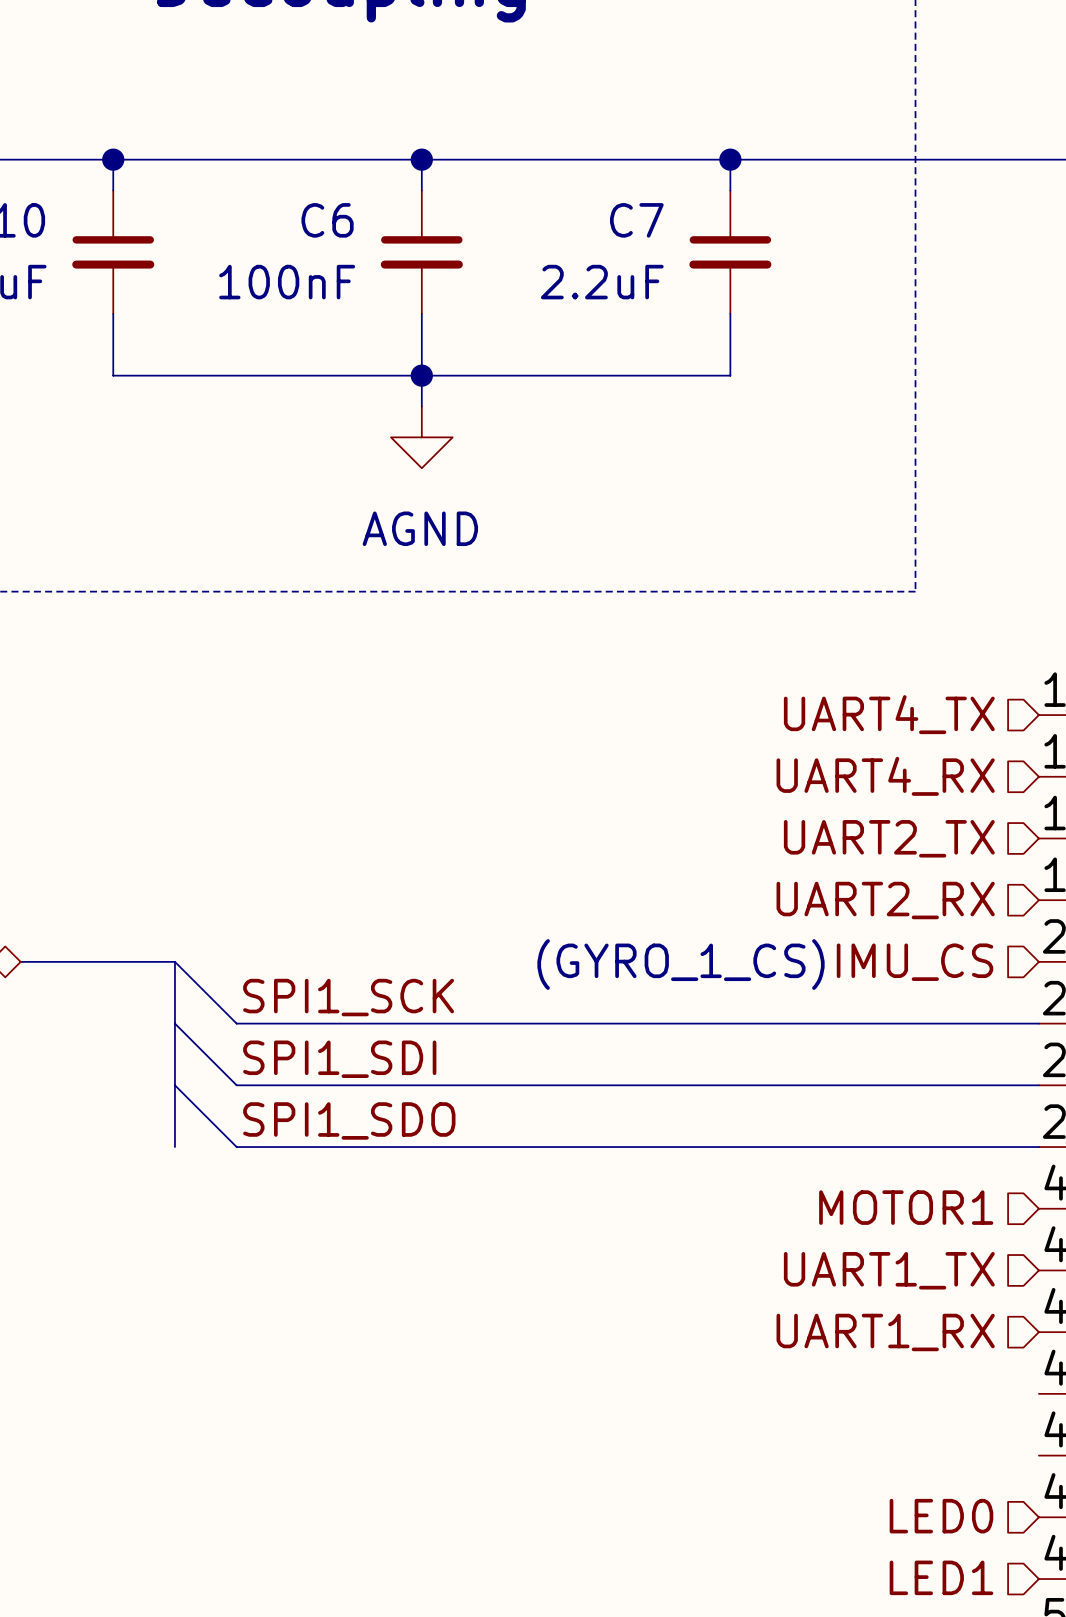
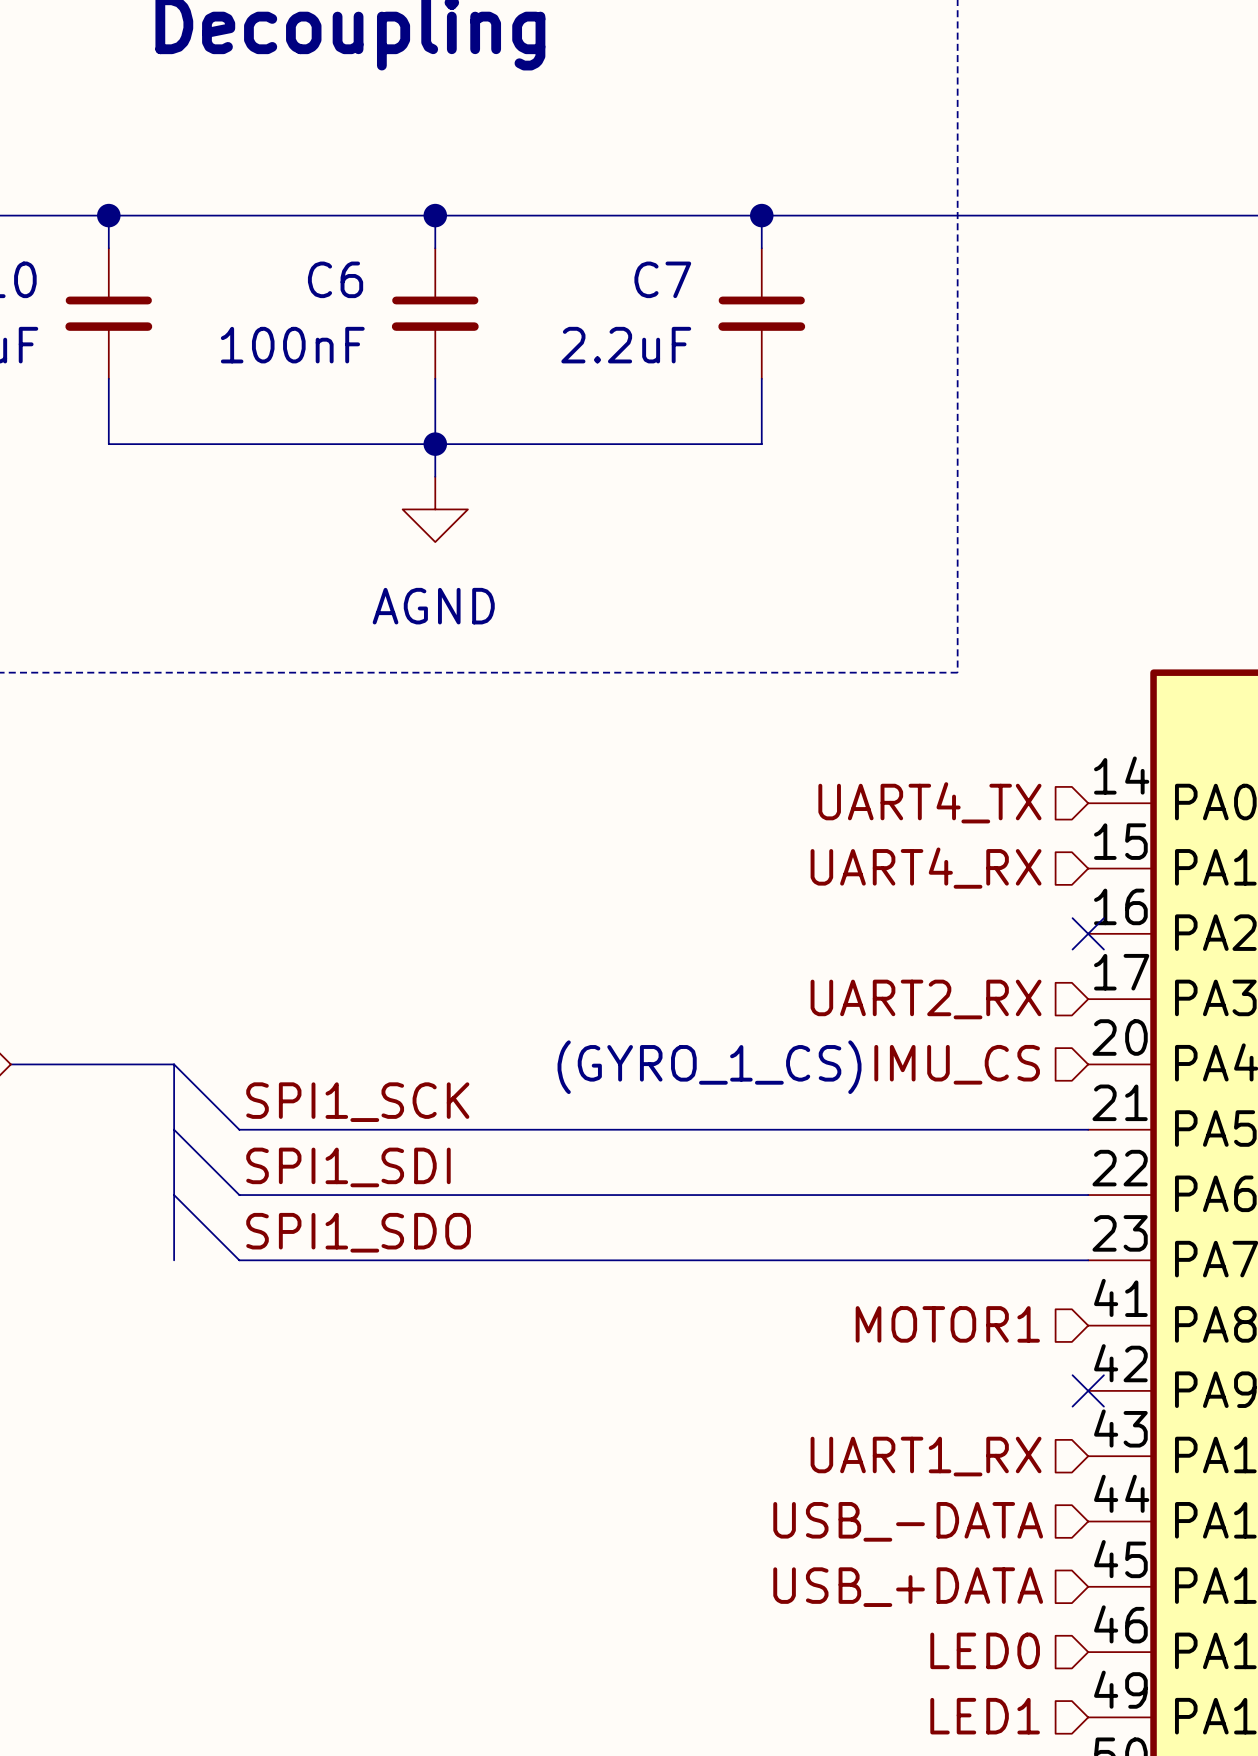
hierarchical label: UART2_TX (889, 838) -> none
no-connect mark: none -> (1088, 933)
hierarchical label: UART1_TX (889, 1270) -> none
no-connect mark: none -> (1088, 1390)
hierarchical label: none -> USB_-DATA (908, 1521)
hierarchical label: none -> USB_+DATA (908, 1587)

